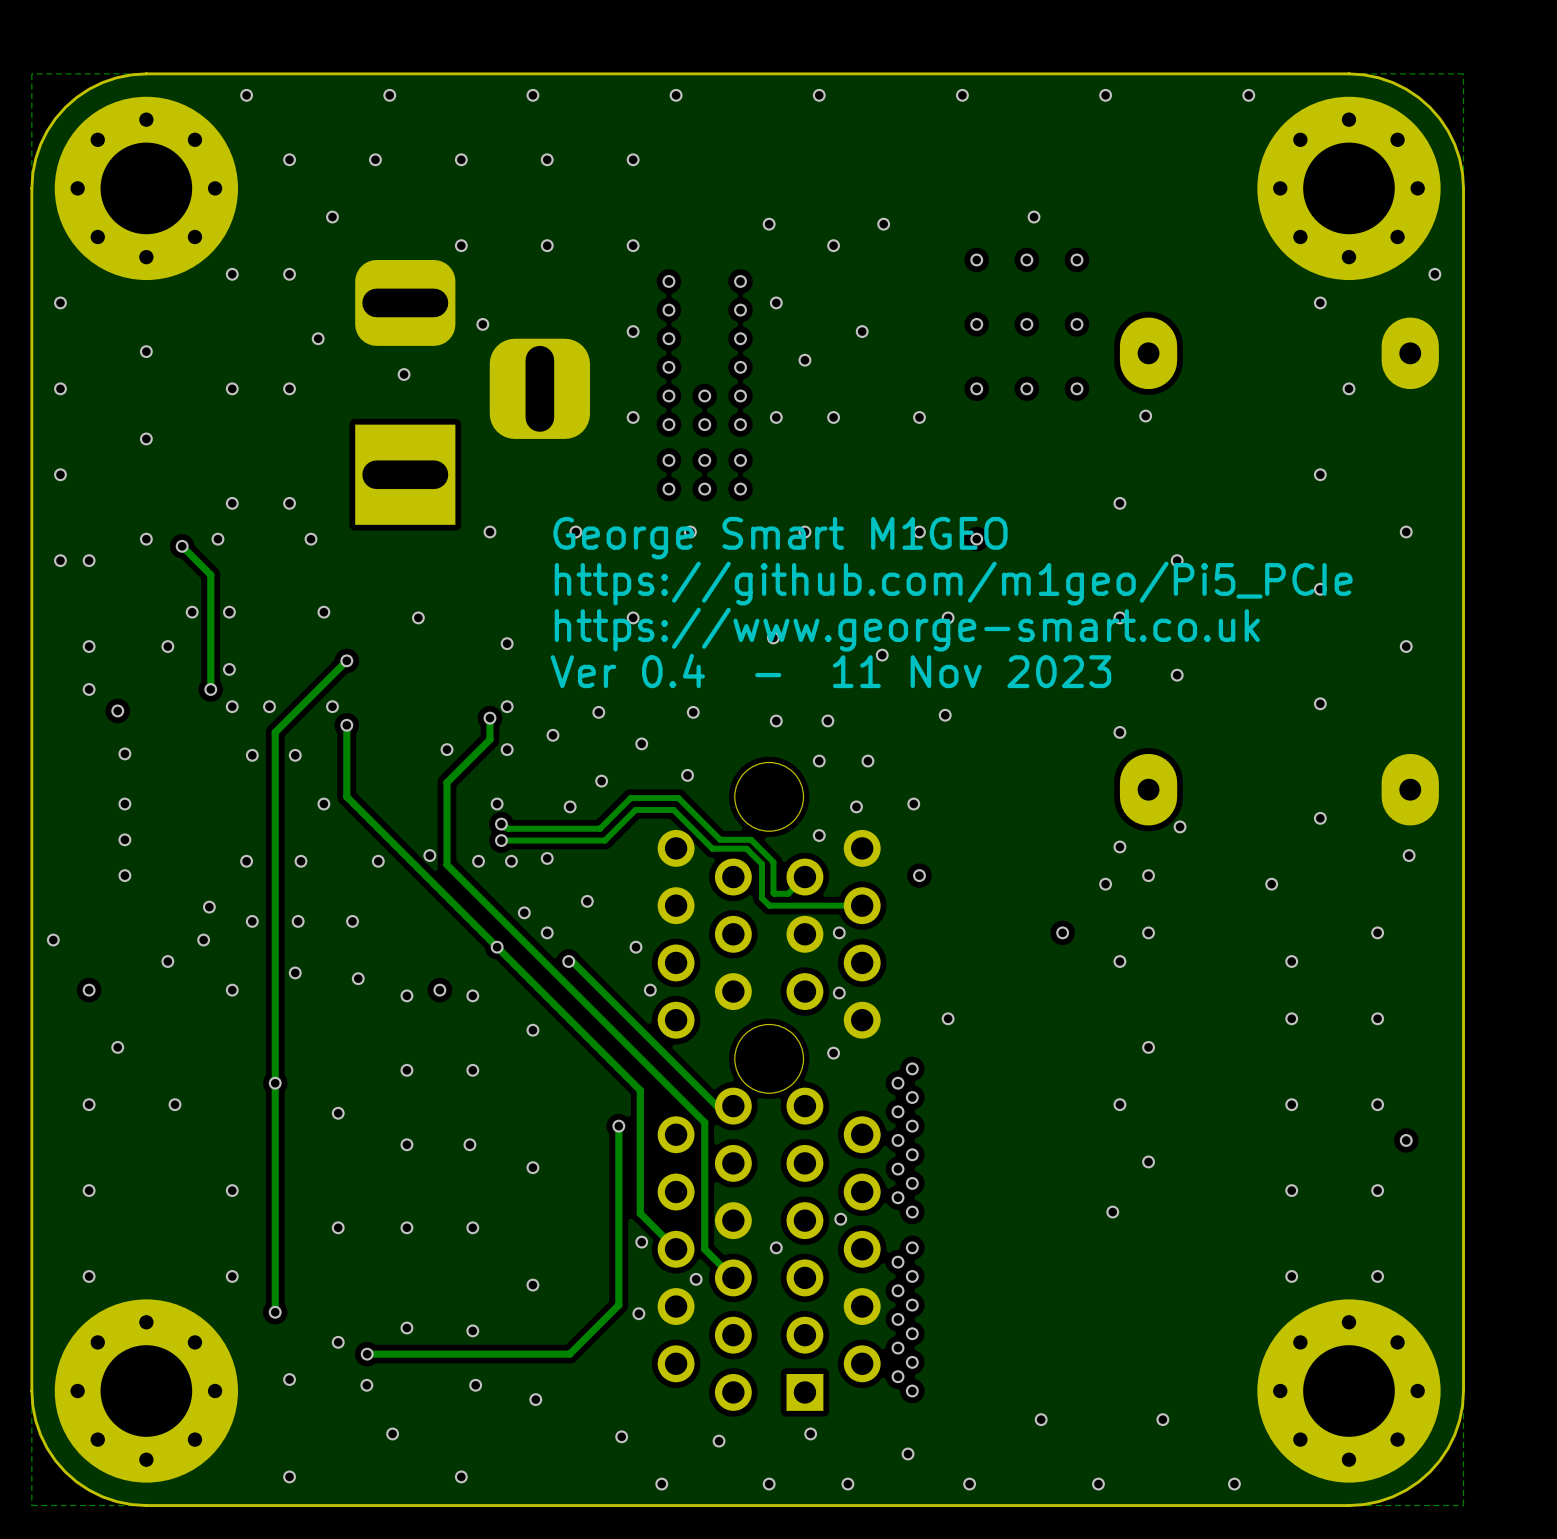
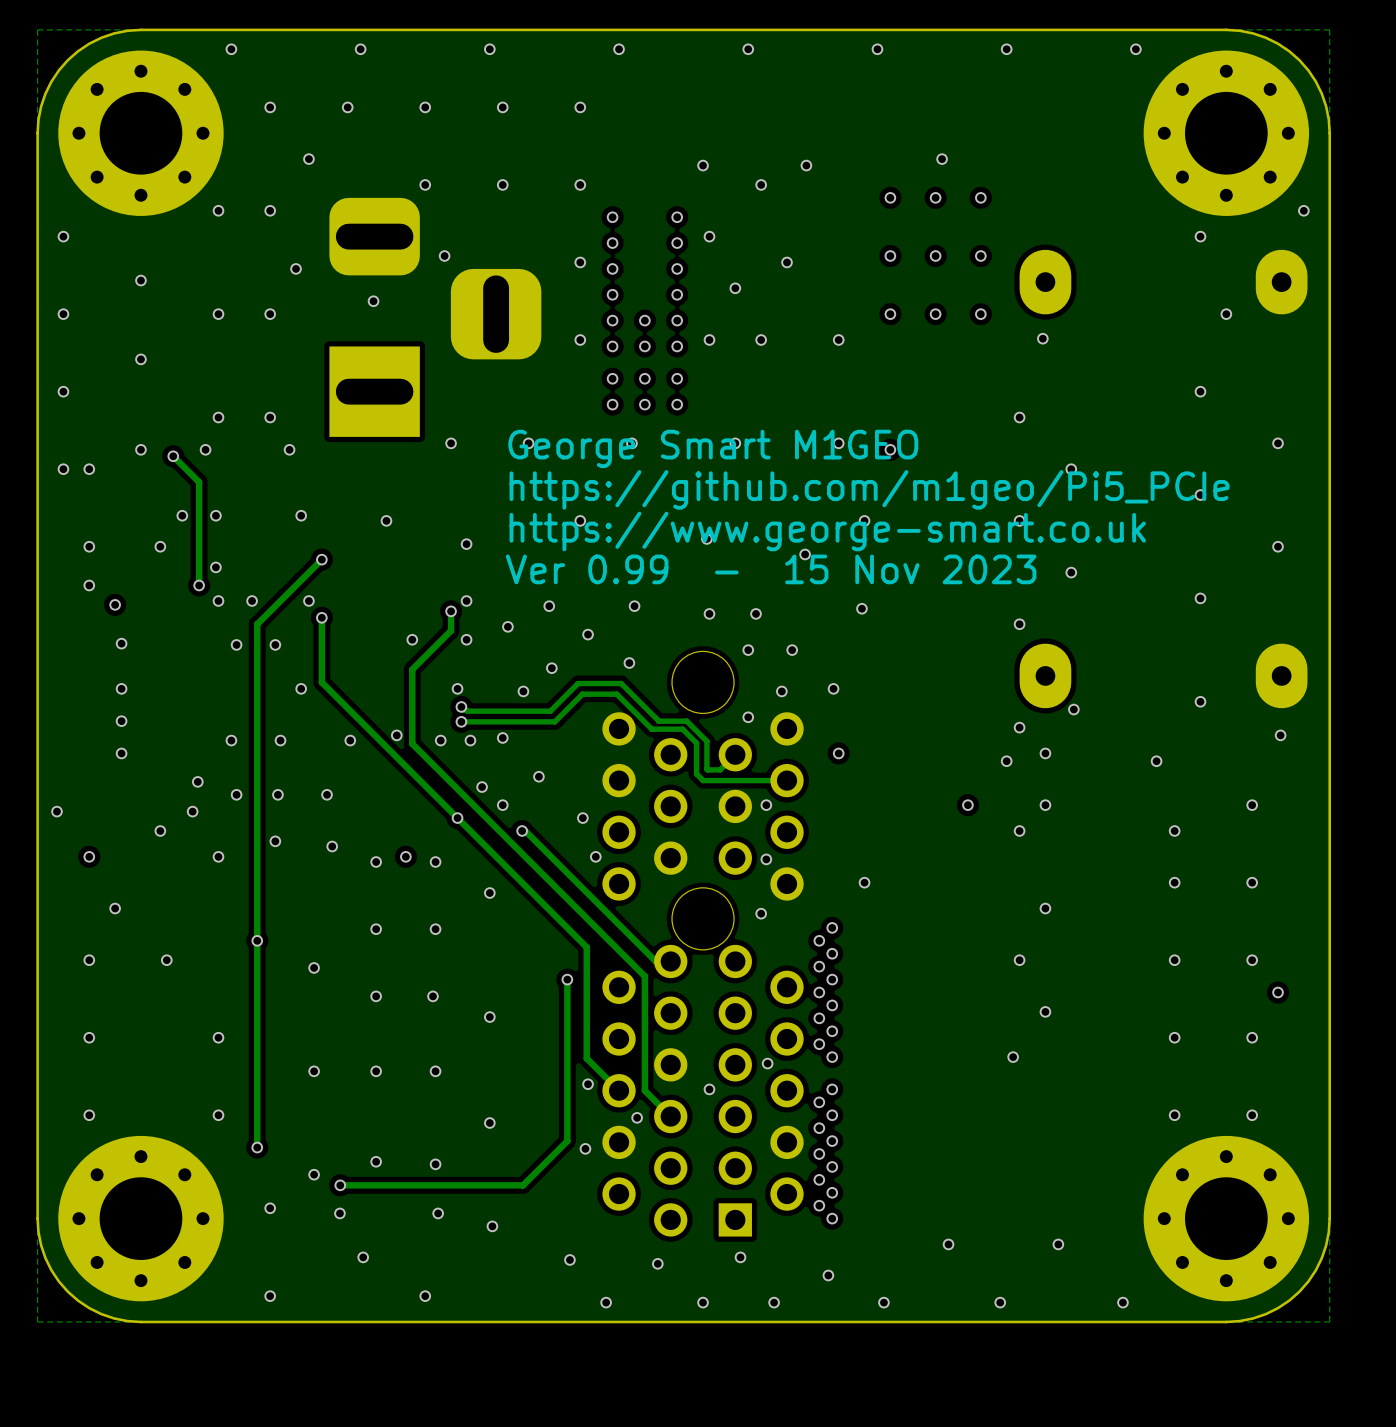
text: Ver 0.4 - 11 Nov 2023 (830, 670) -> Ver 0.99 - 15 Nov 2023 (771, 569)

